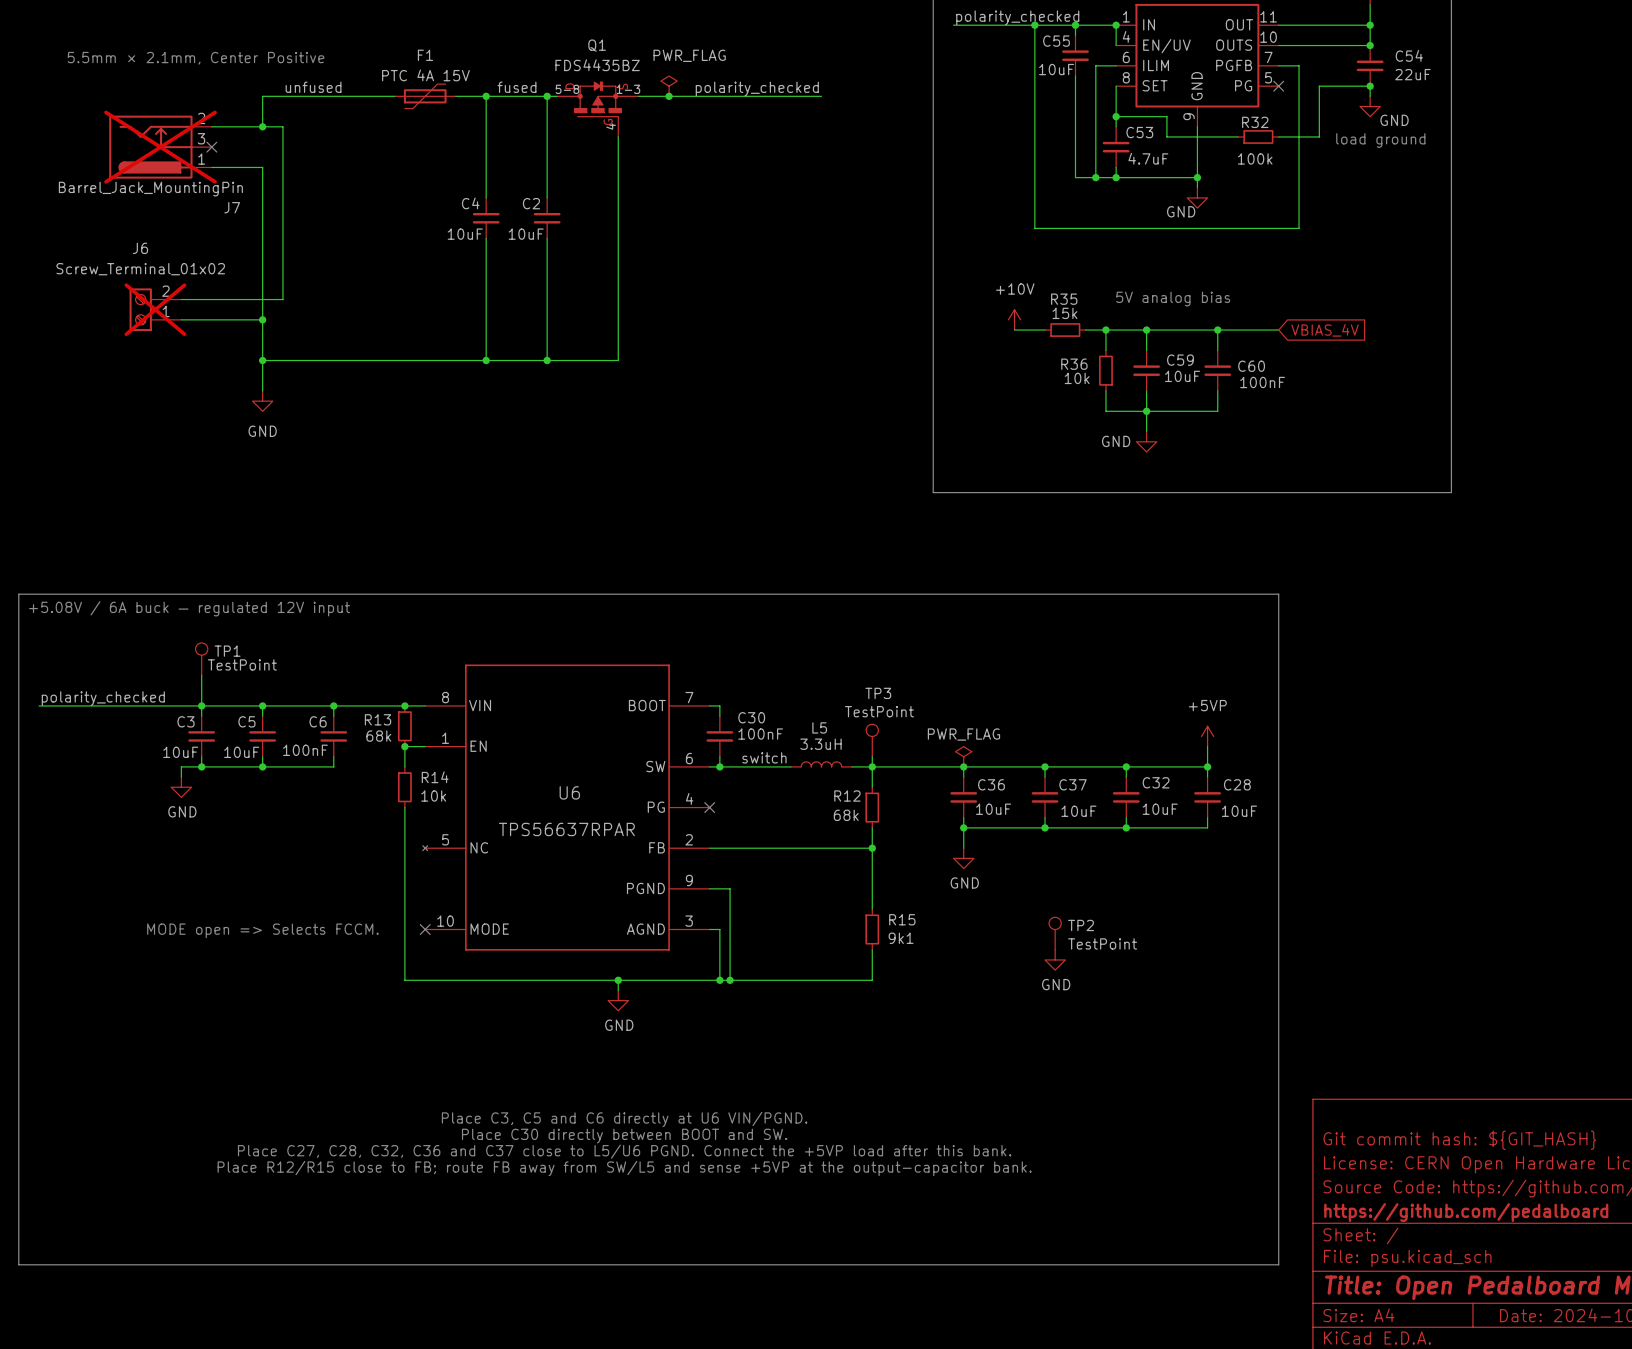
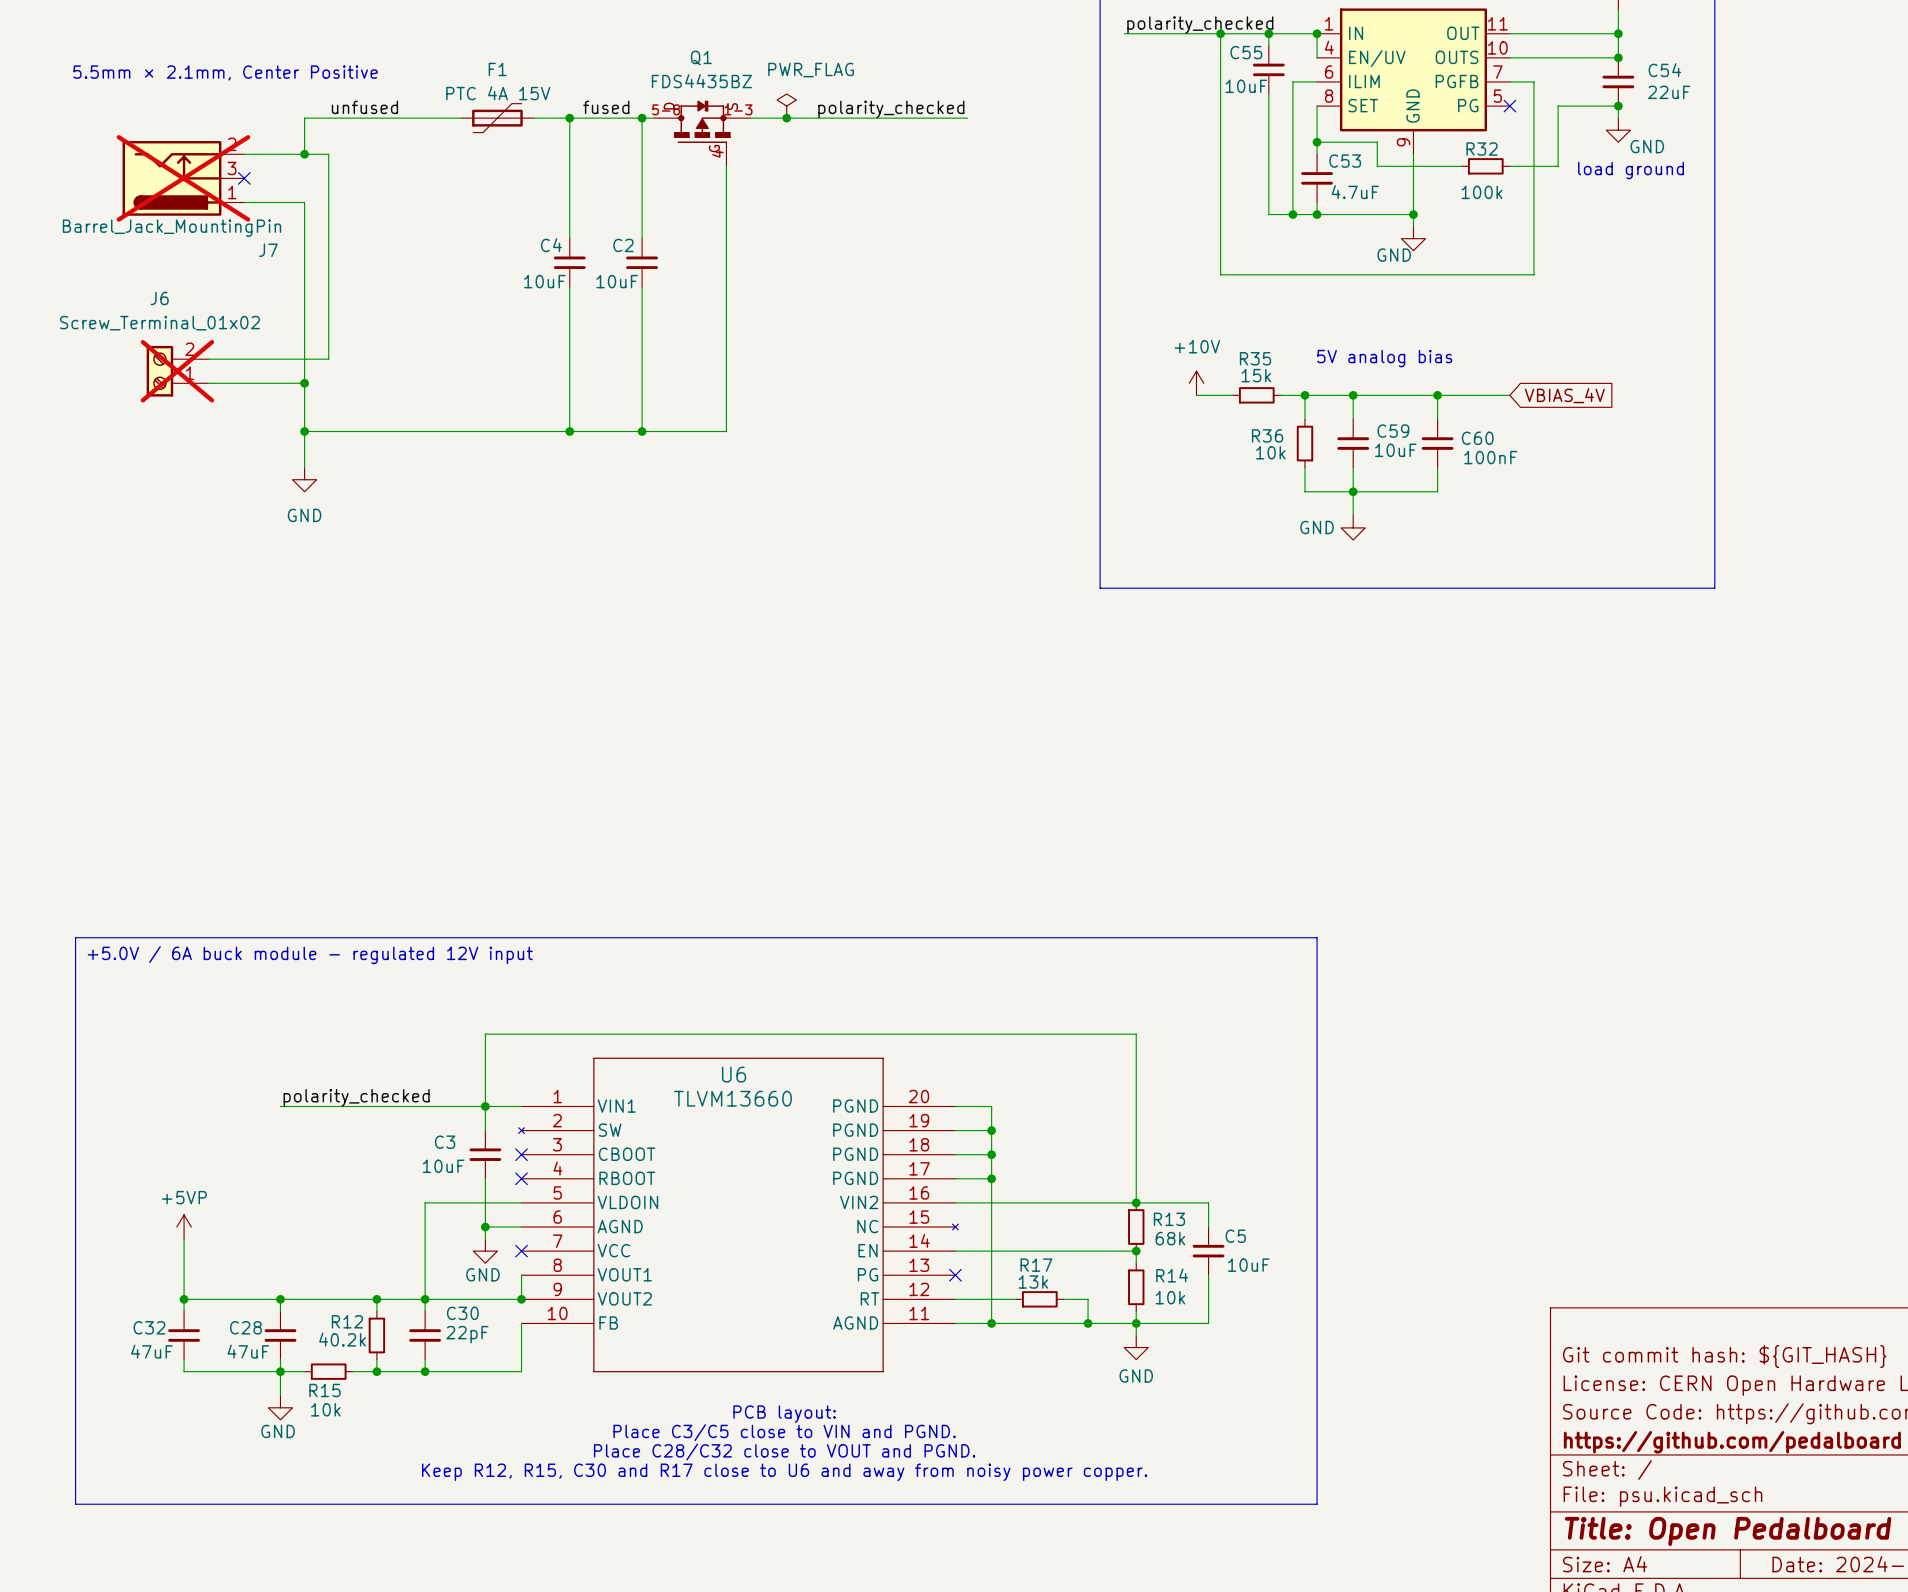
text: +5.08V / 6A buck — regulated 12V input (189, 608) -> none
TP1: TestPoint (201, 659) -> none
U6 symbol: [422, 664, 710, 951] -> [518, 1057, 959, 1373]
wire: (201, 675) (201, 716) -> none
label: polarity_checked (103, 698) -> none
wire: (39, 705) (425, 705) -> none
junction: (201, 705) -> none
wire: (262, 705) (262, 716) -> none
junction: (262, 705) -> none
wire: (333, 705) (333, 716) -> none
junction: (333, 705) -> none
junction: (404, 705) -> none
wire: (709, 705) (719, 705) (719, 716) -> none
R13 name position: R13 (378, 719) -> R13 (1169, 1219)
C3 name position: C3 (185, 721) -> C3 (445, 1142)
C5 name position: C5 (246, 721) -> C5 (1235, 1236)
R13 position: (404, 726) -> (1136, 1227)
C30 value: 100nF (760, 734) -> 22pF (467, 1334)
C3 position: (201, 736) -> (485, 1154)
C5 position: (262, 736) -> (1208, 1251)
C6: 100nF (333, 736) -> none
R13 value position: 68k (378, 736) -> 68k (1170, 1238)
C30 position: (719, 736) -> (425, 1335)
power symbol: +5VP (1207, 736) -> none
TP3: TestPoint (872, 740) -> none
junction: (404, 746) -> none
wire: (425, 746) (404, 746) (404, 766) -> none
wire: (1207, 746) (1207, 777) -> none
C3 value position: 10uF (180, 752) -> 10uF (443, 1166)
C5 value position: 10uF (241, 752) -> 10uF (1248, 1265)
wire: (201, 756) (201, 766) -> none
wire: (262, 756) (262, 766) -> none
wire: (333, 756) (333, 766) (181, 766) (181, 777) -> none
wire: (719, 756) (719, 766) -> none
wire: (872, 756) (872, 787) -> none
power symbol: PWR_FLAG (963, 756) -> none
label: switch (764, 757) -> none
L5: 3.3uH (821, 764) -> none
junction: (201, 766) -> none
junction: (262, 766) -> none
wire: (709, 766) (790, 766) -> none
junction: (719, 766) -> none
wire: (851, 766) (1207, 766) -> none
junction: (872, 766) -> none
wire: (963, 766) (963, 777) -> none
junction: (963, 766) -> none
wire: (1045, 766) (1045, 777) -> none
junction: (1045, 766) -> none
wire: (1126, 766) (1126, 777) -> none
junction: (1126, 766) -> none
junction: (1207, 766) -> none
C32 name position: C32 (1156, 782) -> C32 (149, 1327)
C28 name position: C28 (1237, 784) -> C28 (245, 1327)
power symbol: GND (181, 787) -> none
R14 position: (404, 787) -> (1136, 1287)
U6 name position: U6 (569, 792) -> U6 (734, 1074)
C36: 10uF (963, 797) -> none
C37: 10uF (1045, 797) -> none
C32 position: (1126, 797) -> (184, 1335)
C28 position: (1207, 797) -> (280, 1335)
text: none -> +5.0V / 6A buck module - regulated 12V input (310, 955)
wire: (404, 807) (404, 980) (872, 980) (872, 949) -> none
no-connect mark: (709, 807) -> none
R12 position: (872, 807) -> (376, 1335)
C32 value: 10uF (1160, 809) -> 47uF (151, 1351)
C28 value: 10uF (1239, 811) -> 47uF (248, 1351)
R12 value: 68k (846, 815) -> 40.2k (342, 1339)
wire: (963, 817) (963, 848) -> none
wire: (1045, 817) (1045, 827) -> none
wire: (1126, 817) (1126, 827) -> none
wire: (1207, 817) (1207, 827) (963, 827) -> none
wire: (872, 827) (872, 909) -> none
junction: (963, 827) -> none
junction: (1045, 827) -> none
junction: (1126, 827) -> none
U6 value: TPS56637RPAR (566, 829) -> TLVM13660 (732, 1098)
wire: (709, 848) (872, 848) -> none
junction: (872, 848) -> none
power symbol: GND (963, 858) -> none
wire: (709, 888) (730, 888) (730, 980) -> none
R15 name position: R15 (902, 919) -> R15 (324, 1390)
label: none -> polarity_checked (356, 1097)
wire: none -> (280, 1106) (521, 1106)
junction: none -> (485, 1106)
no-connect mark: (425, 929) -> none
wire: (709, 929) (719, 929) (719, 980) -> none
wire: none -> (955, 1106) (991, 1106) (991, 1323)
R15 rotation: 0° (872, 929) -> 90° clockwise (328, 1371)
R15 position: (872, 929) -> (328, 1371)
text: MODE open => Selects FCCM. (262, 930) -> none
TP2: TestPoint (1055, 933) -> none
R15 value: 9k1 (901, 938) -> 10k (325, 1409)
wire: none -> (485, 1130) (485, 1034) (1136, 1034) (1136, 1202)
wire: none -> (955, 1130) (991, 1130)
junction: none -> (991, 1130)
power symbol: GND (1055, 959) -> none
no-connect mark: none -> (521, 1154)
wire: none -> (955, 1154) (991, 1154)
junction: none -> (991, 1154)
wire: (618, 980) (618, 990) -> none
junction: (618, 980) -> none
junction: (719, 980) -> none
junction: (730, 980) -> none
wire: none -> (485, 1178) (485, 1239)
no-connect mark: none -> (521, 1178)
wire: none -> (955, 1178) (991, 1178)
junction: none -> (991, 1178)
power symbol: GND (618, 1000) -> none
wire: none -> (521, 1202) (425, 1202) (425, 1311)
wire: none -> (955, 1202) (1208, 1202) (1208, 1227)
junction: none -> (1136, 1202)
power symbol: none -> +5VP (184, 1227)
wire: none -> (485, 1227) (521, 1227)
junction: none -> (485, 1227)
wire: none -> (184, 1239) (184, 1311)
power symbol: none -> GND (485, 1251)
no-connect mark: none -> (521, 1251)
wire: none -> (955, 1251) (1136, 1251) (1136, 1263)
junction: none -> (1136, 1251)
wire: none -> (521, 1275) (521, 1299) (184, 1299)
no-connect mark: none -> (955, 1275)
wire: none -> (1208, 1275) (1208, 1323) (955, 1323)
junction: none -> (184, 1299)
wire: none -> (280, 1299) (280, 1311)
junction: none -> (280, 1299)
wire: none -> (376, 1299) (376, 1311)
junction: none -> (376, 1299)
junction: none -> (425, 1299)
junction: none -> (521, 1299)
wire: none -> (955, 1299) (1015, 1299)
R17: none -> 13k (1039, 1299)
wire: none -> (1063, 1299) (1088, 1299) (1088, 1323)
wire: none -> (1136, 1311) (1136, 1335)
wire: none -> (521, 1323) (521, 1371) (352, 1371)
junction: none -> (991, 1323)
junction: none -> (1088, 1323)
junction: none -> (1136, 1323)
text: Place C3, C5 and C6 directly at U6 VIN/PGND. (624, 1119) -> none
power symbol: none -> GND (1136, 1347)
text: Place C30 directly between BOOT and SW. (624, 1136) -> none
wire: none -> (184, 1359) (184, 1371) (304, 1371)
wire: none -> (280, 1359) (280, 1395)
wire: none -> (376, 1359) (376, 1371)
wire: none -> (425, 1359) (425, 1371)
text: Place C27, C28, C32, C36 and C37 close to L5/U6 PGND. Connect the +5VP load after this bank. (624, 1151) -> none
junction: none -> (280, 1371)
junction: none -> (376, 1371)
junction: none -> (425, 1371)
text: Place R12/R15 close to FB; route FB away from SW/L5 and sense +5VP at the output-capacitor bank. (624, 1168) -> none
power symbol: none -> GND (280, 1407)
text: none -> PCB layout: (784, 1414)
text: none -> Place C3/C5 close to VIN and PGND. (784, 1432)
text: none -> Place C28/C32 close to VOUT and PGND. (784, 1452)
text: none -> Keep R12, R15, C30 and R17 close to U6 and away from noisy power copper. (784, 1472)
line: (69, 1264) (18, 1264) (18, 594) (1278, 594) (1278, 1264) (1116, 1264) -> (75, 1504) (75, 937) (1317, 937) (1317, 1504)

